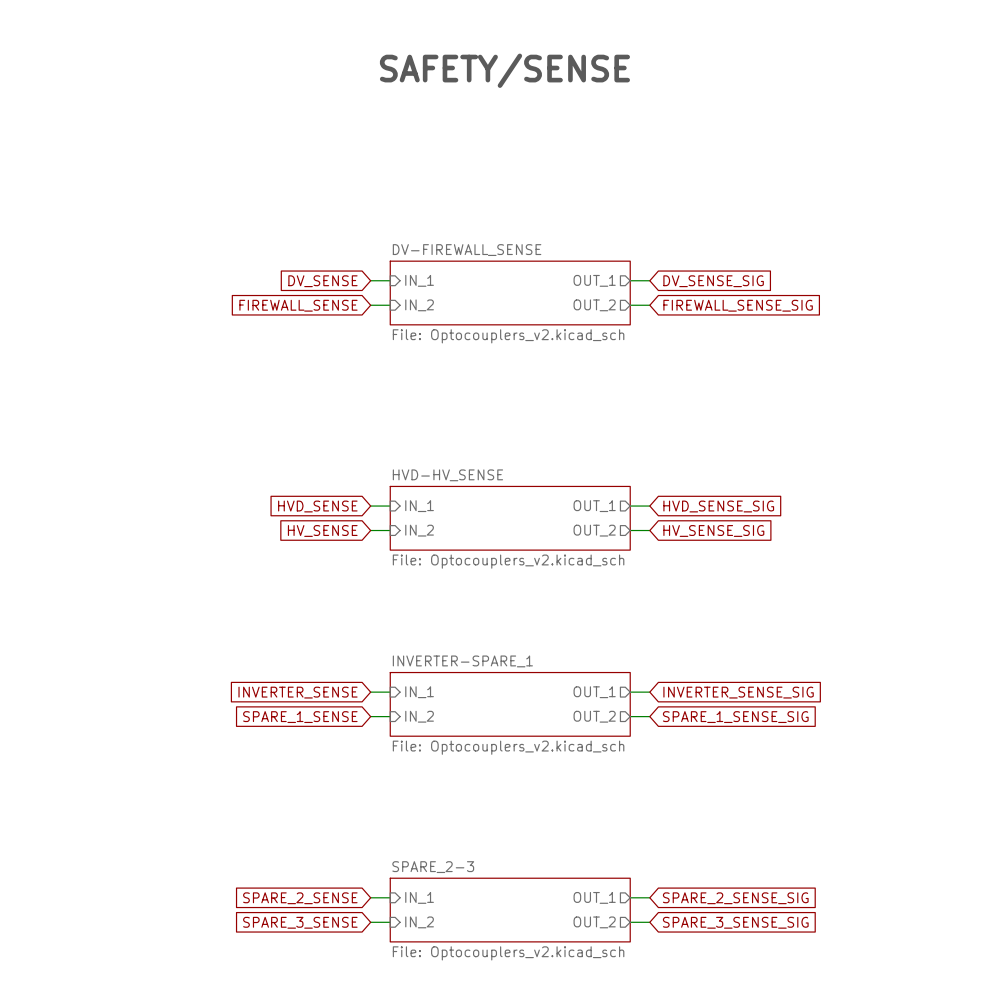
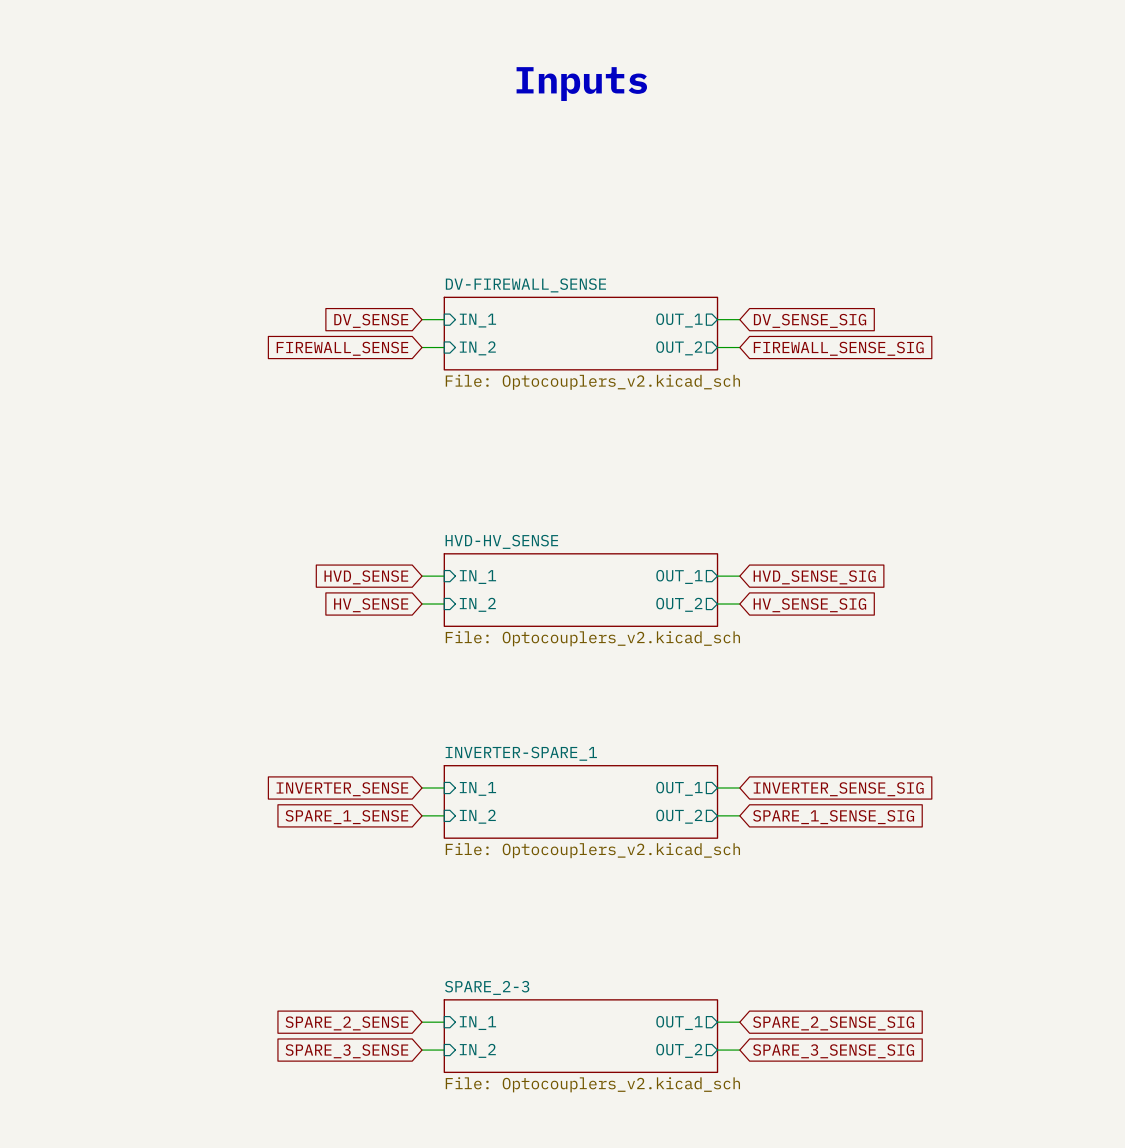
text: SAFETY/SENSE (504, 70) -> none
text: none -> Inputs (581, 84)

